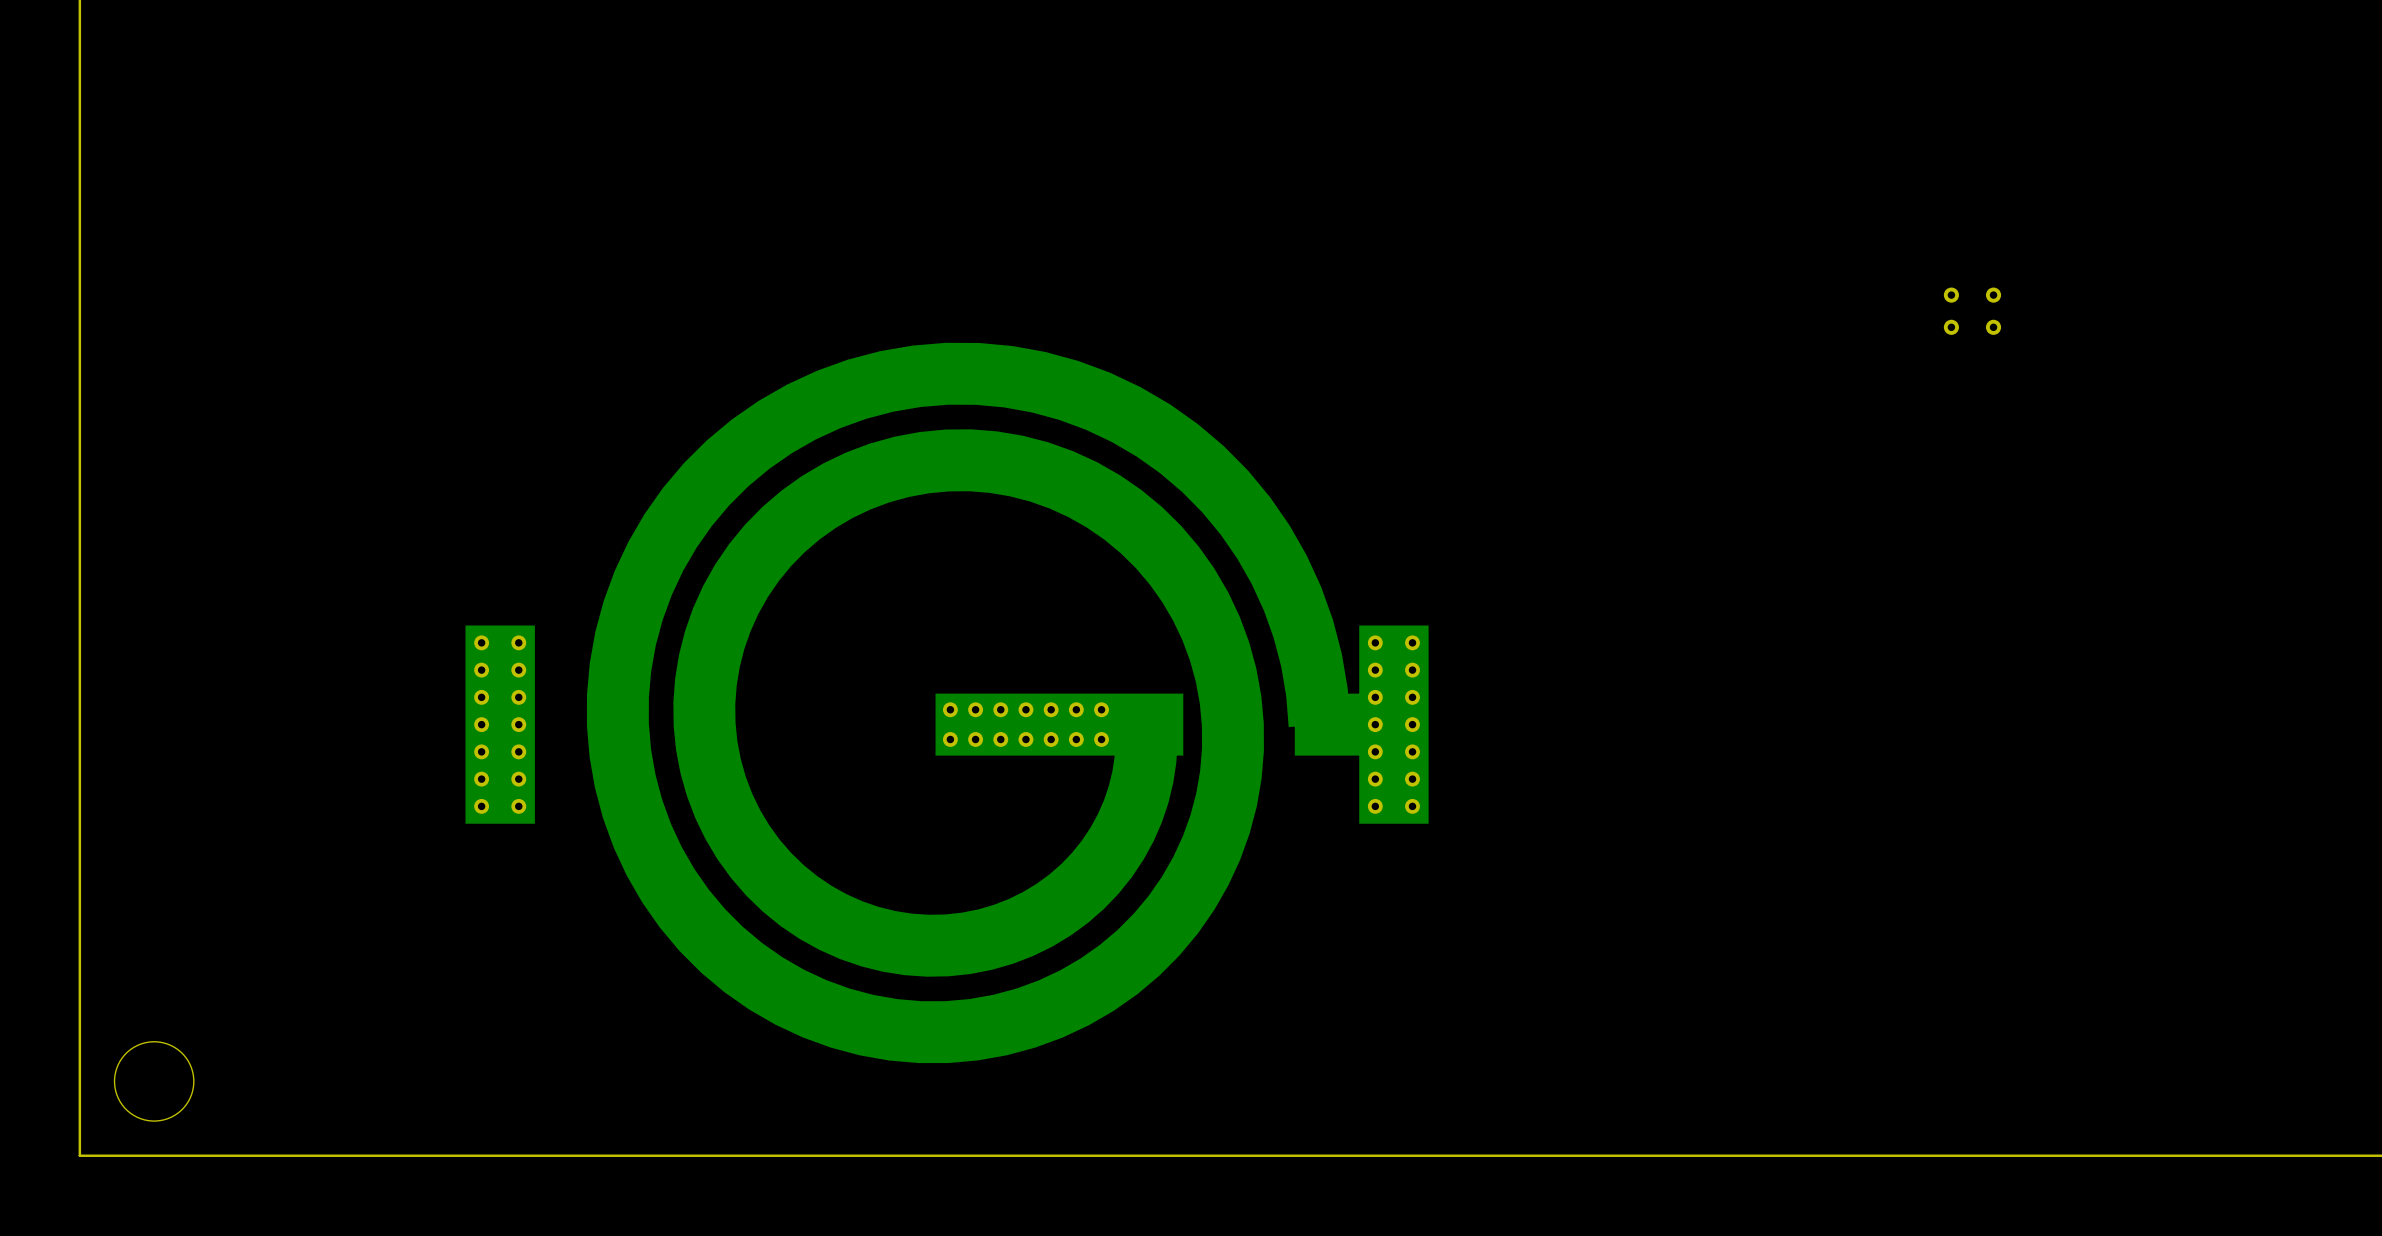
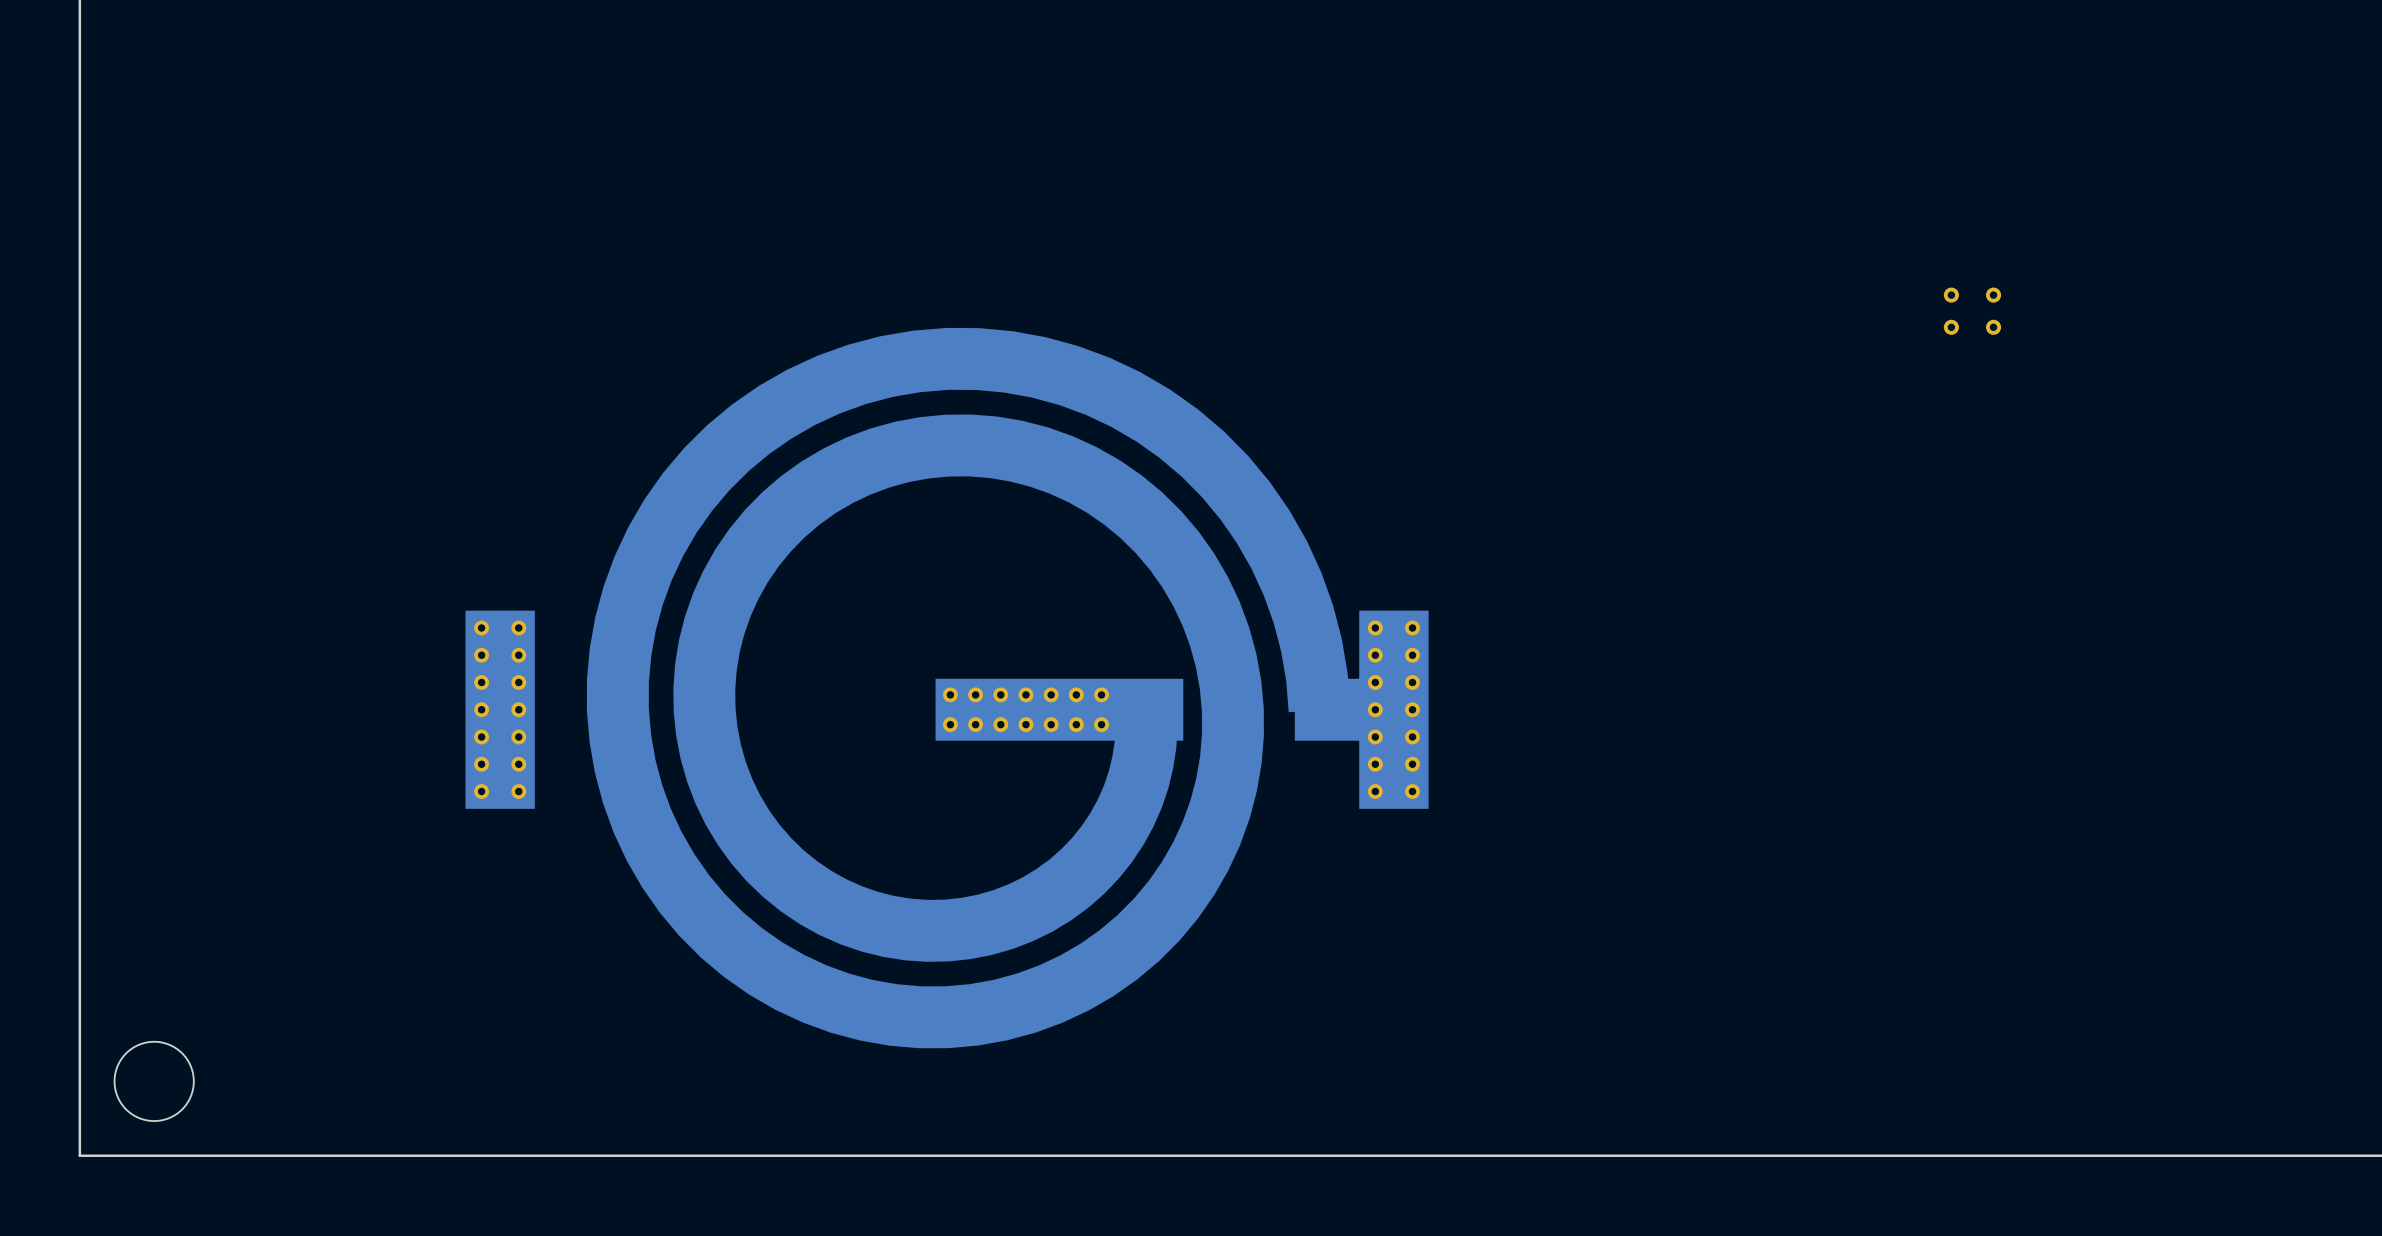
part position: (947, 702) -> (947, 688)

